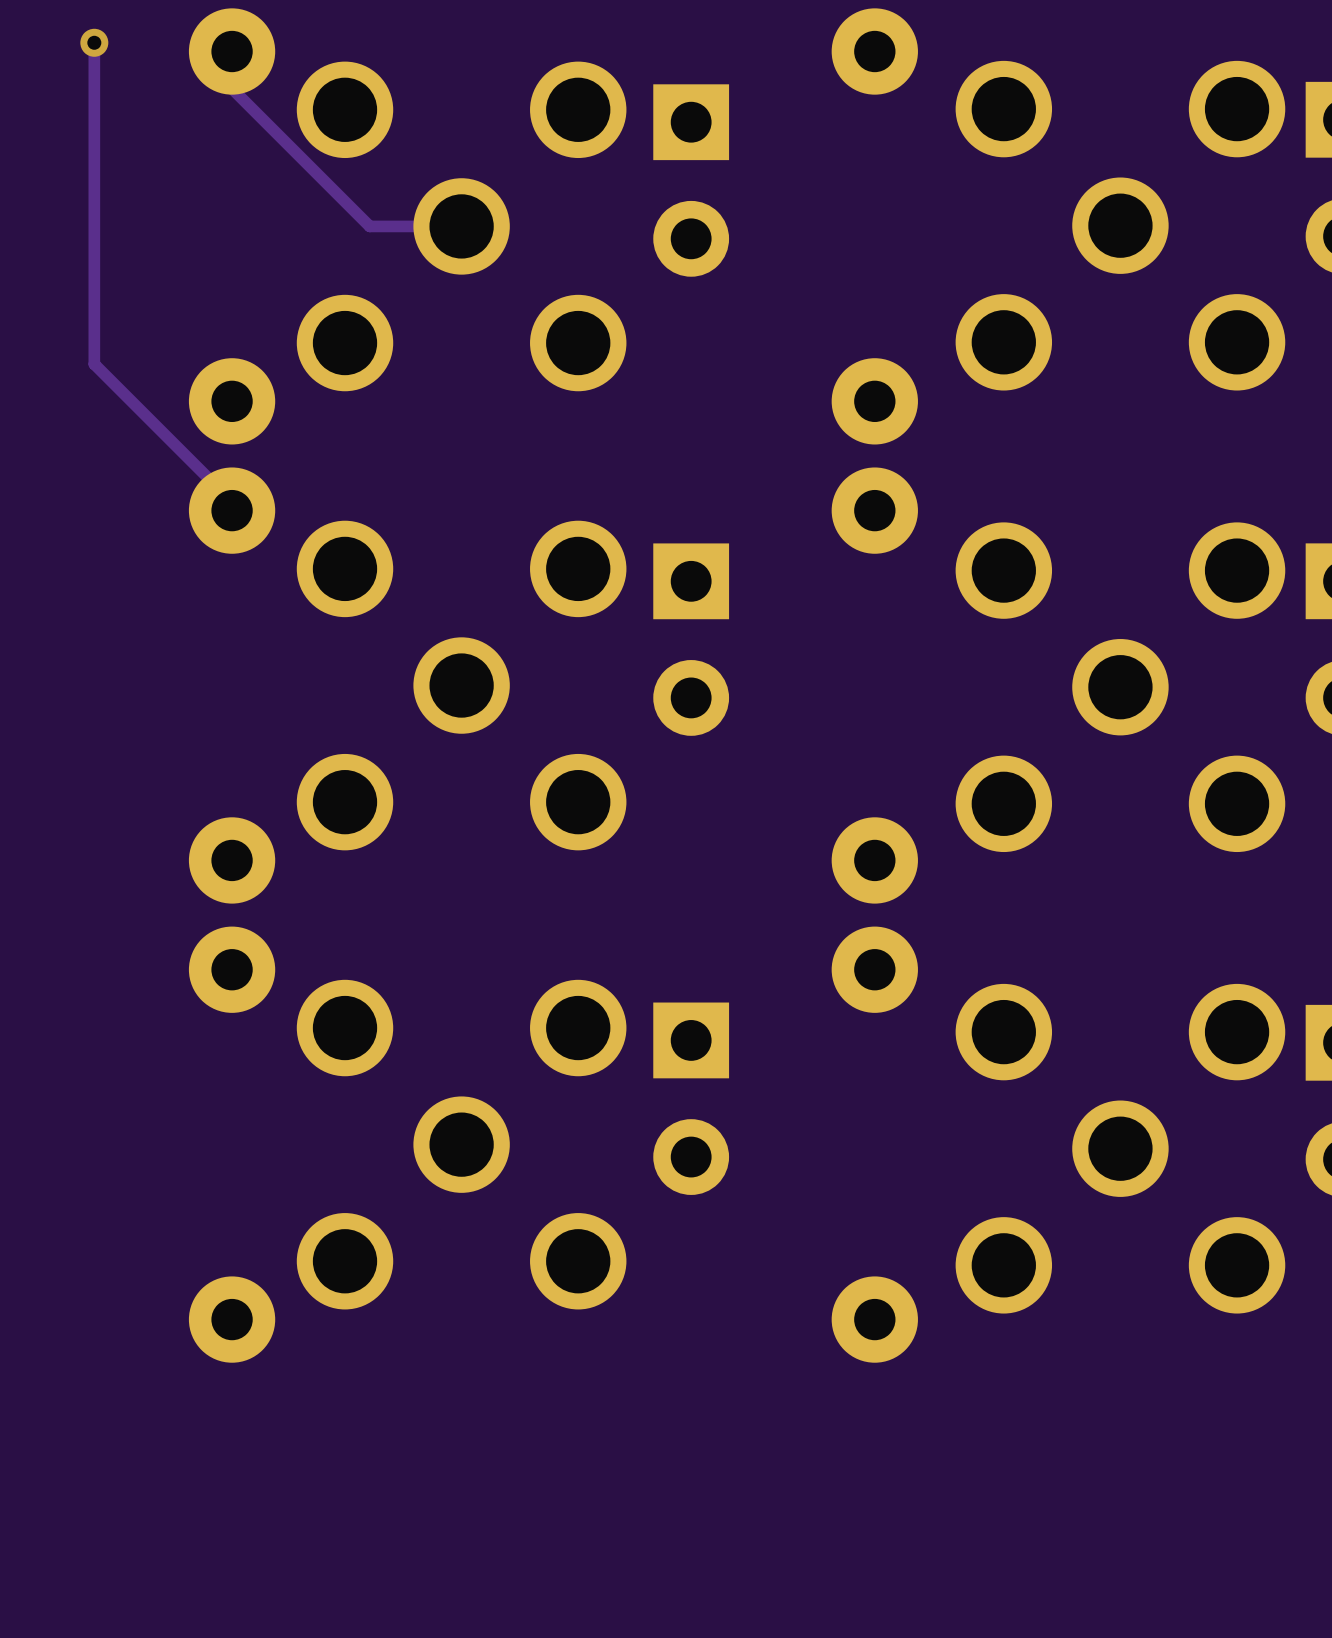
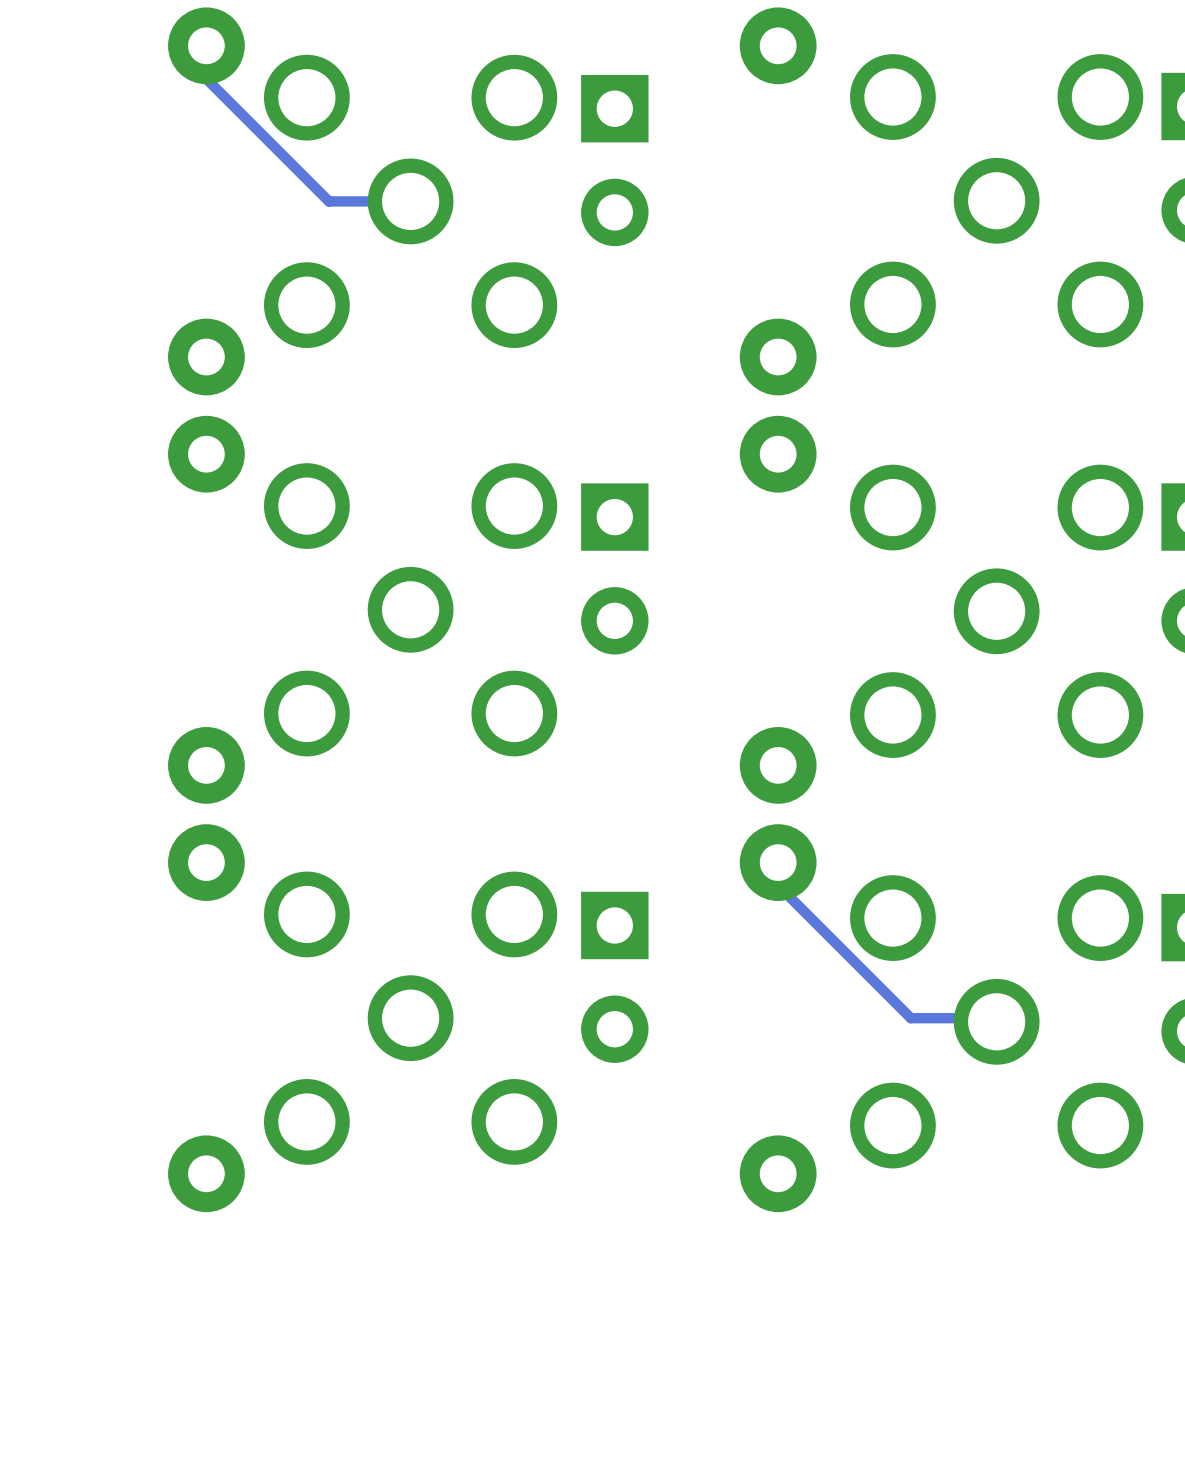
track: (94, 42) (94, 364) (232, 501) (232, 510) -> none
via: (94, 42) -> none
track: none -> (778, 862) (778, 885) (910, 1018) (992, 1018) (996, 1021)

